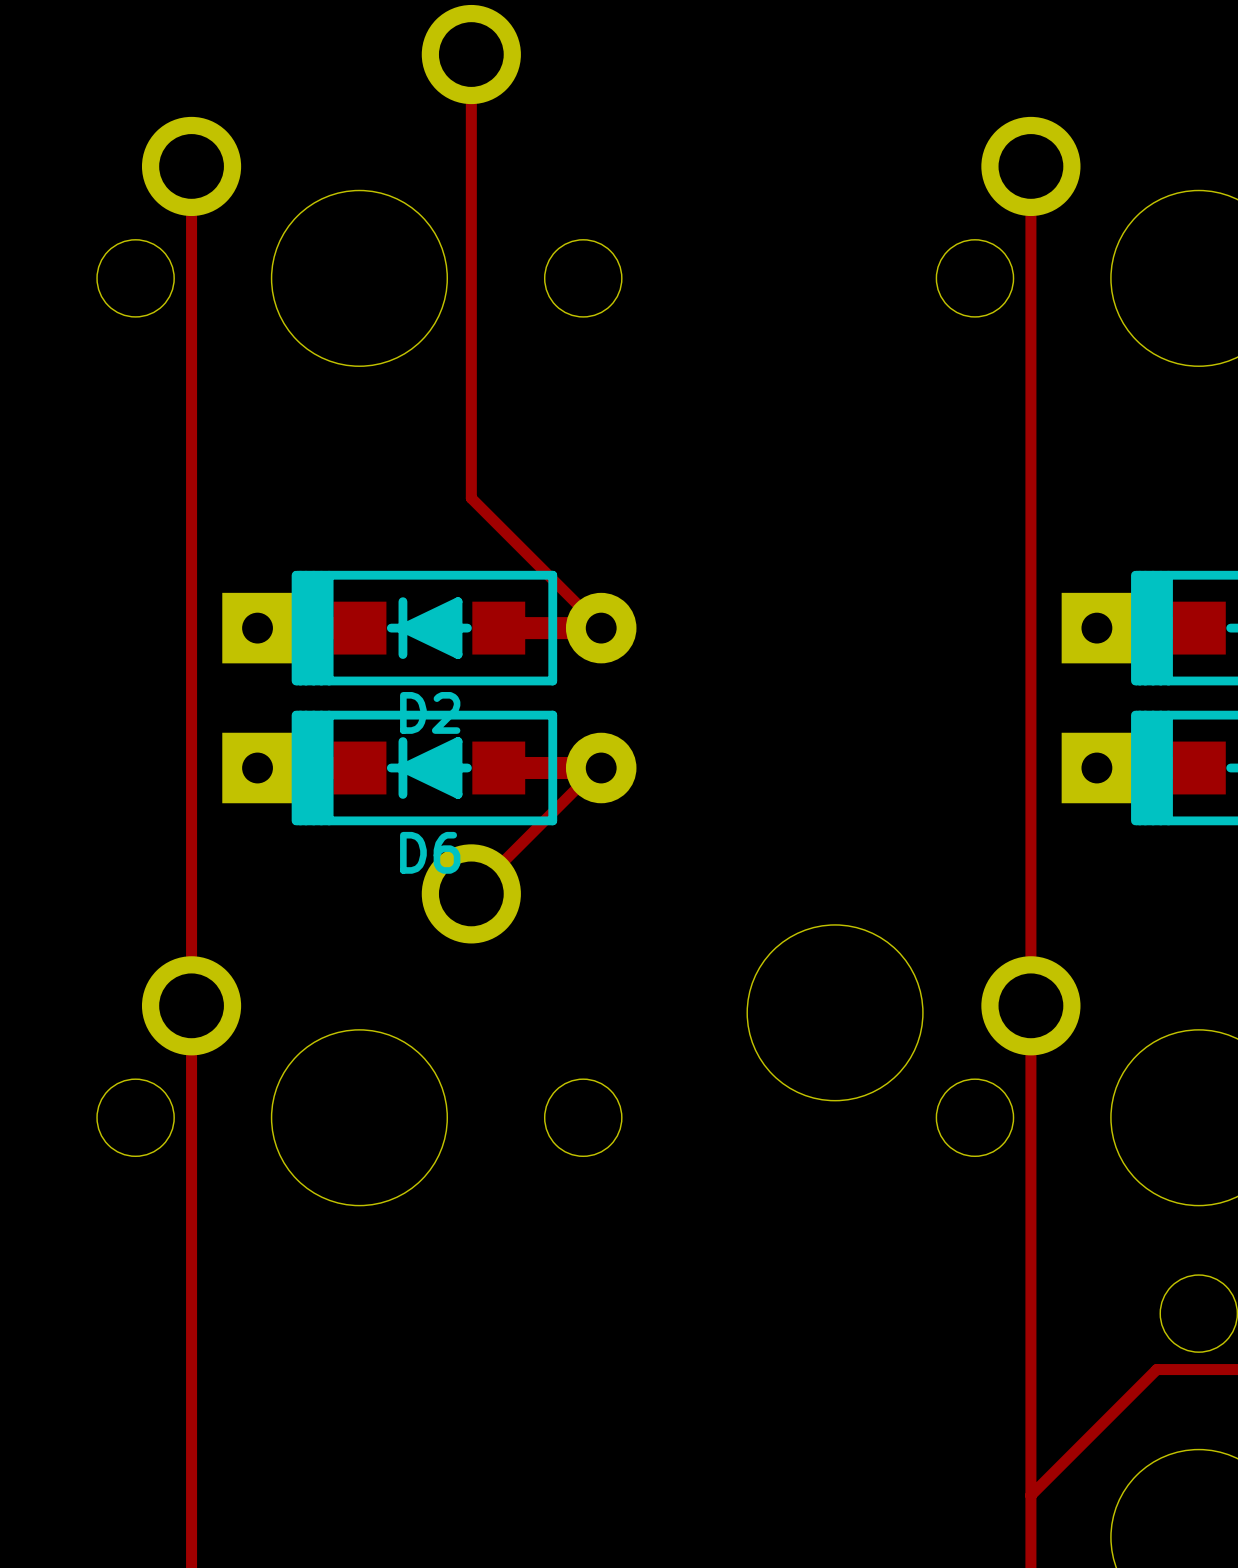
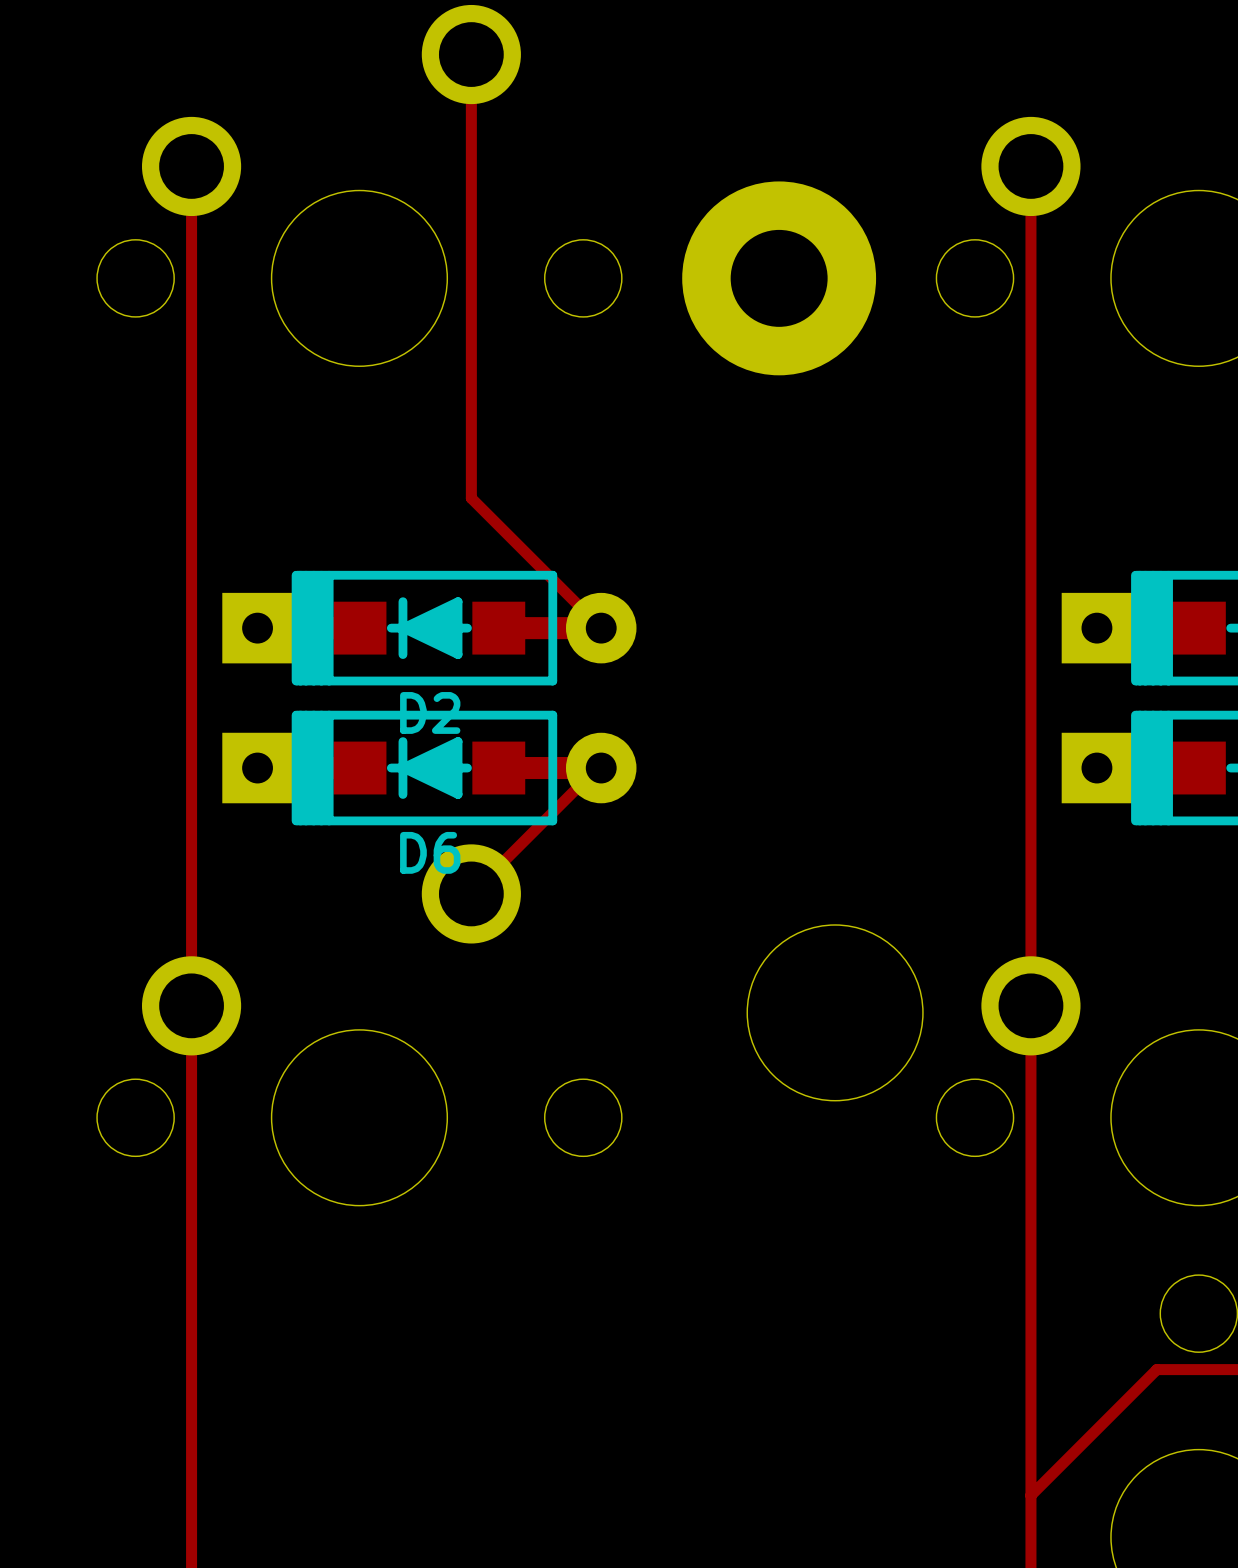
part: none -> (779, 278)

